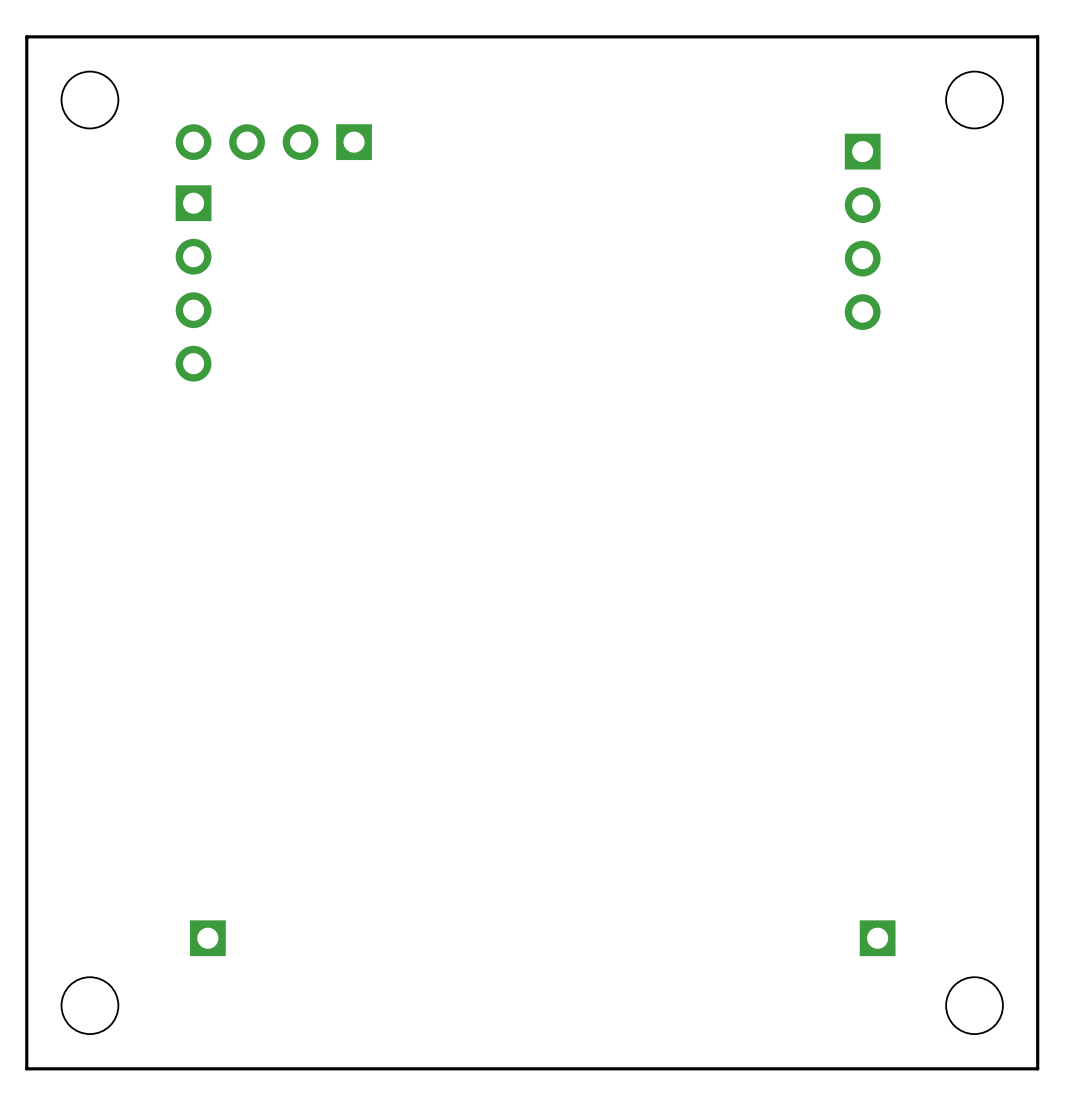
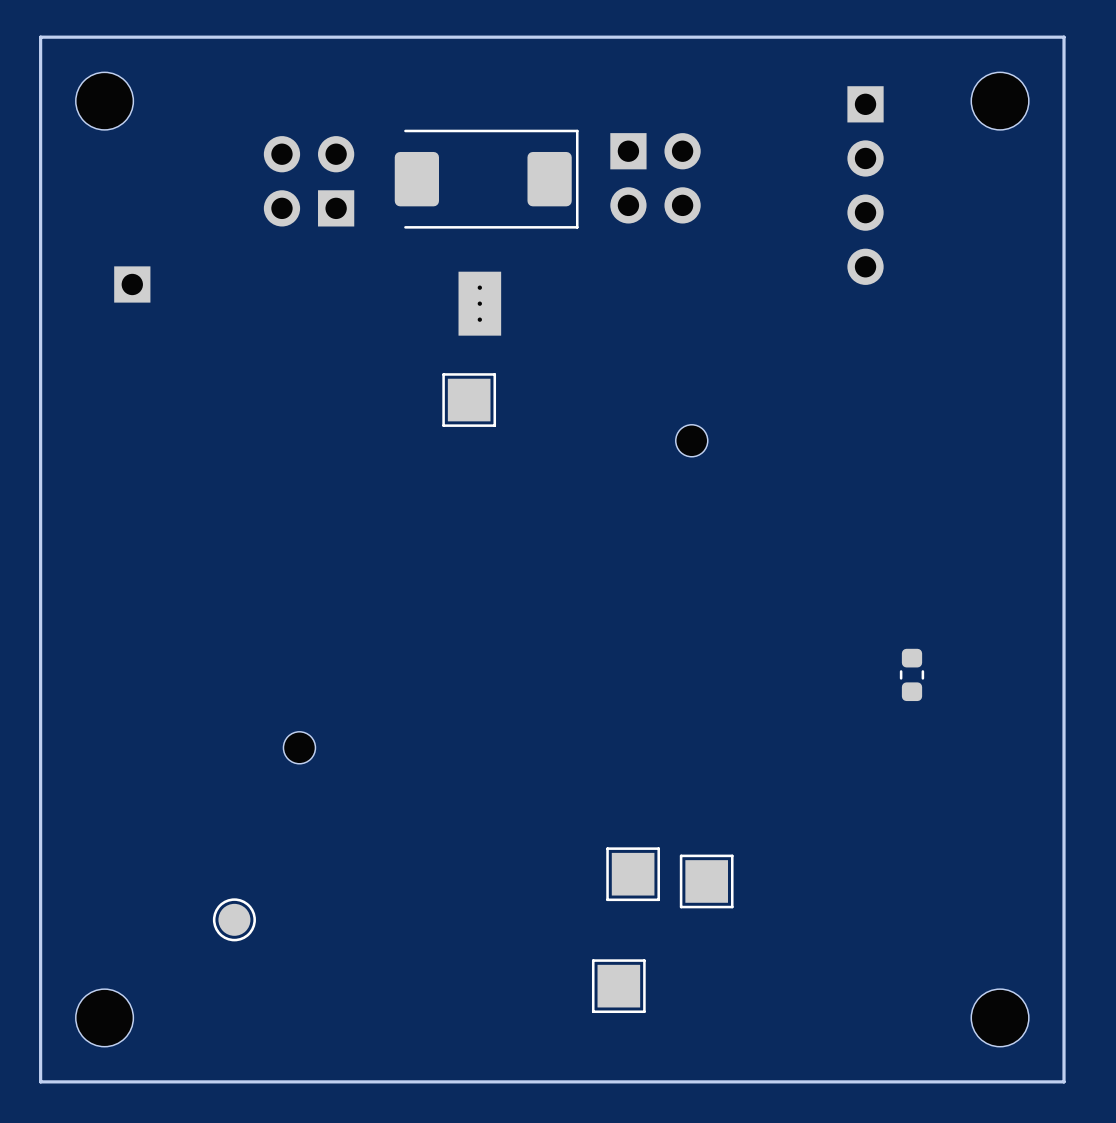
part: (273, 142) -> none
part: none -> (655, 178)
part: none -> (486, 179)
part: none -> (309, 181)
part position: (862, 231) -> (865, 185)
part: none -> (132, 284)
part: (193, 283) -> none
part: none -> (479, 303)
part: none -> (469, 400)
part: none -> (691, 440)
part: none -> (912, 674)
part: none -> (299, 747)
part: none -> (633, 874)
part: none -> (706, 881)
part: none -> (234, 919)
part: (207, 938) -> none
part: (877, 938) -> none
part: none -> (618, 986)

